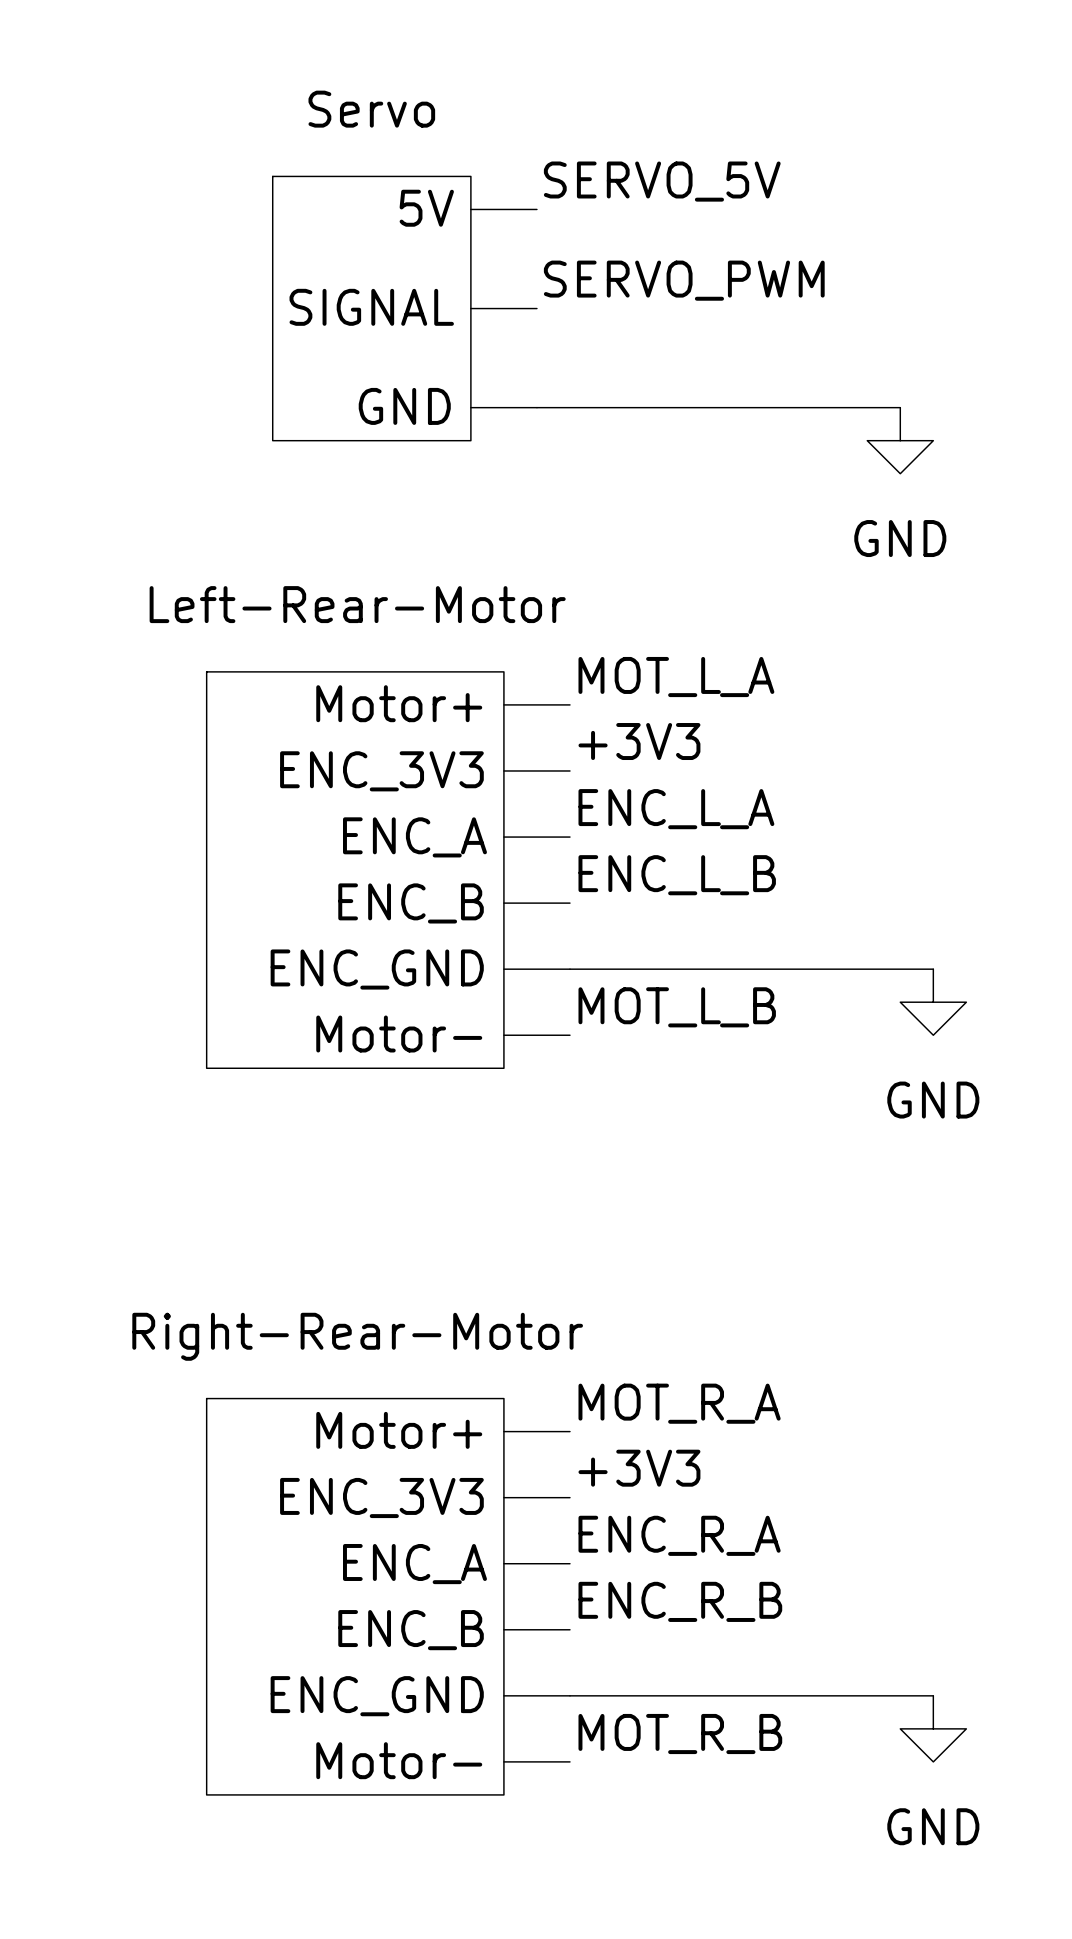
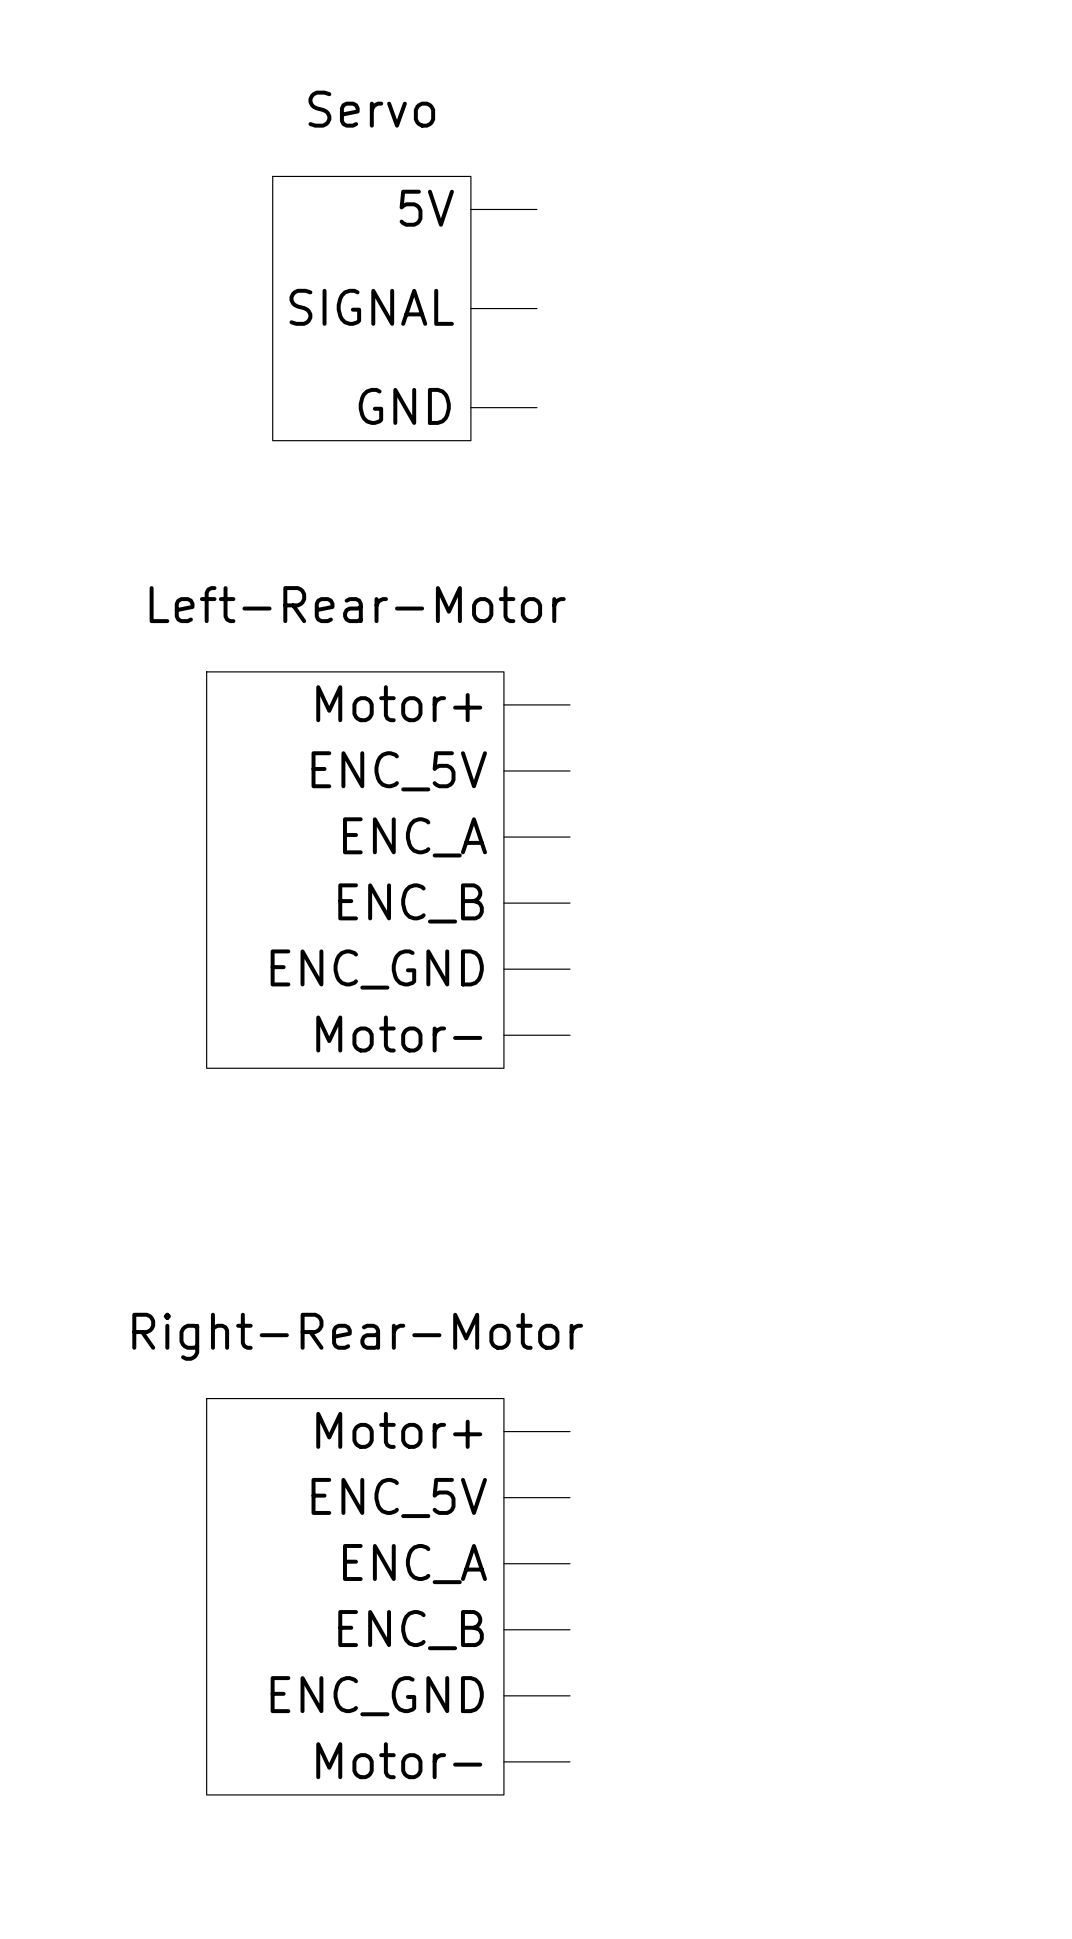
label: SERVO_5V (662, 181) -> none
label: SERVO_PWM (684, 280) -> none
wire: (536, 407) (900, 407) -> none
power symbol: GND (900, 440) -> none
label: MOT_L_A (676, 677) -> none
label: +3V3 (639, 741) -> none
Left-Rear-Motor pin name: ENC_3V3 (381, 771) -> ENC_5V (399, 771)
label: ENC_L_A (676, 809) -> none
label: ENC_L_B (677, 875) -> none
wire: (569, 969) (933, 969) -> none
power symbol: GND (933, 1002) -> none
label: MOT_L_B (677, 1007) -> none
label: MOT_R_A (679, 1403) -> none
label: +3V3 (639, 1468) -> none
Right-Rear-Motor pin name: ENC_3V3 (381, 1498) -> ENC_5V (399, 1498)
label: ENC_R_A (679, 1535) -> none
label: ENC_R_B (680, 1601) -> none
wire: (569, 1695) (933, 1695) -> none
power symbol: GND (933, 1728) -> none
label: MOT_R_B (680, 1734) -> none

